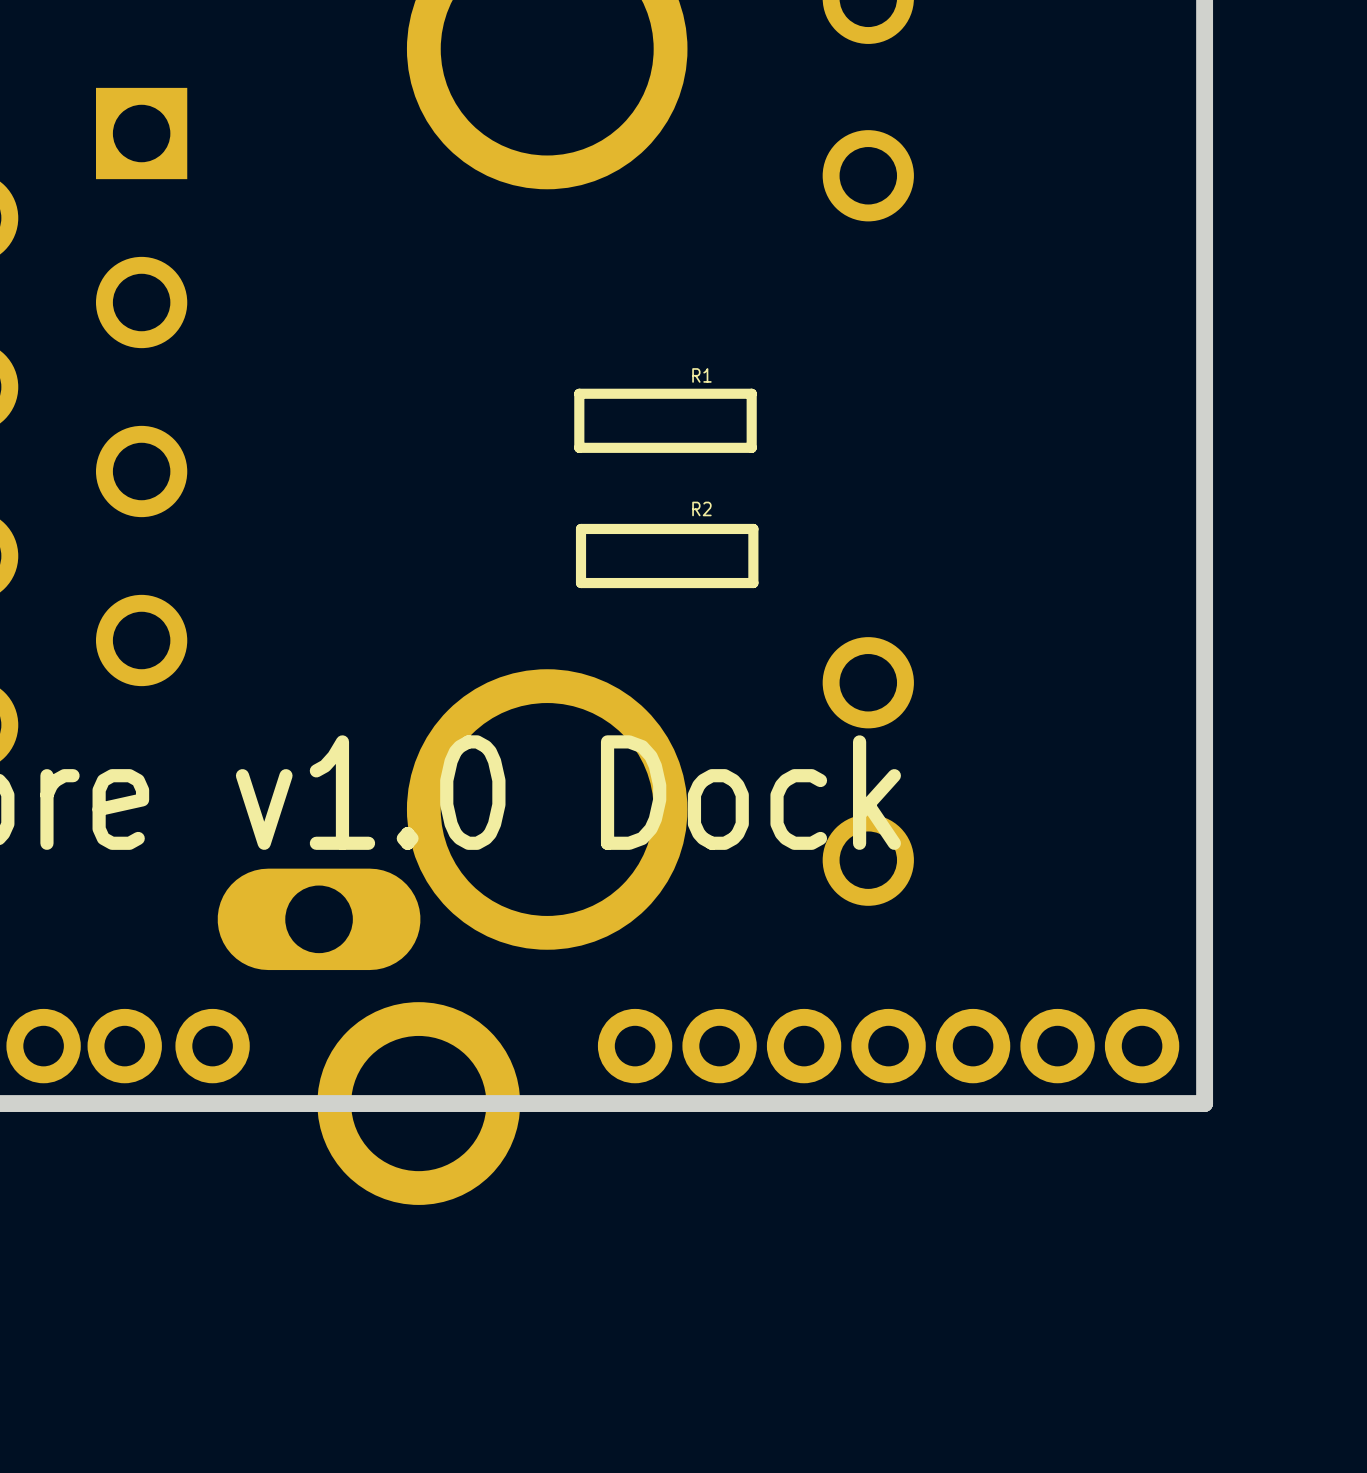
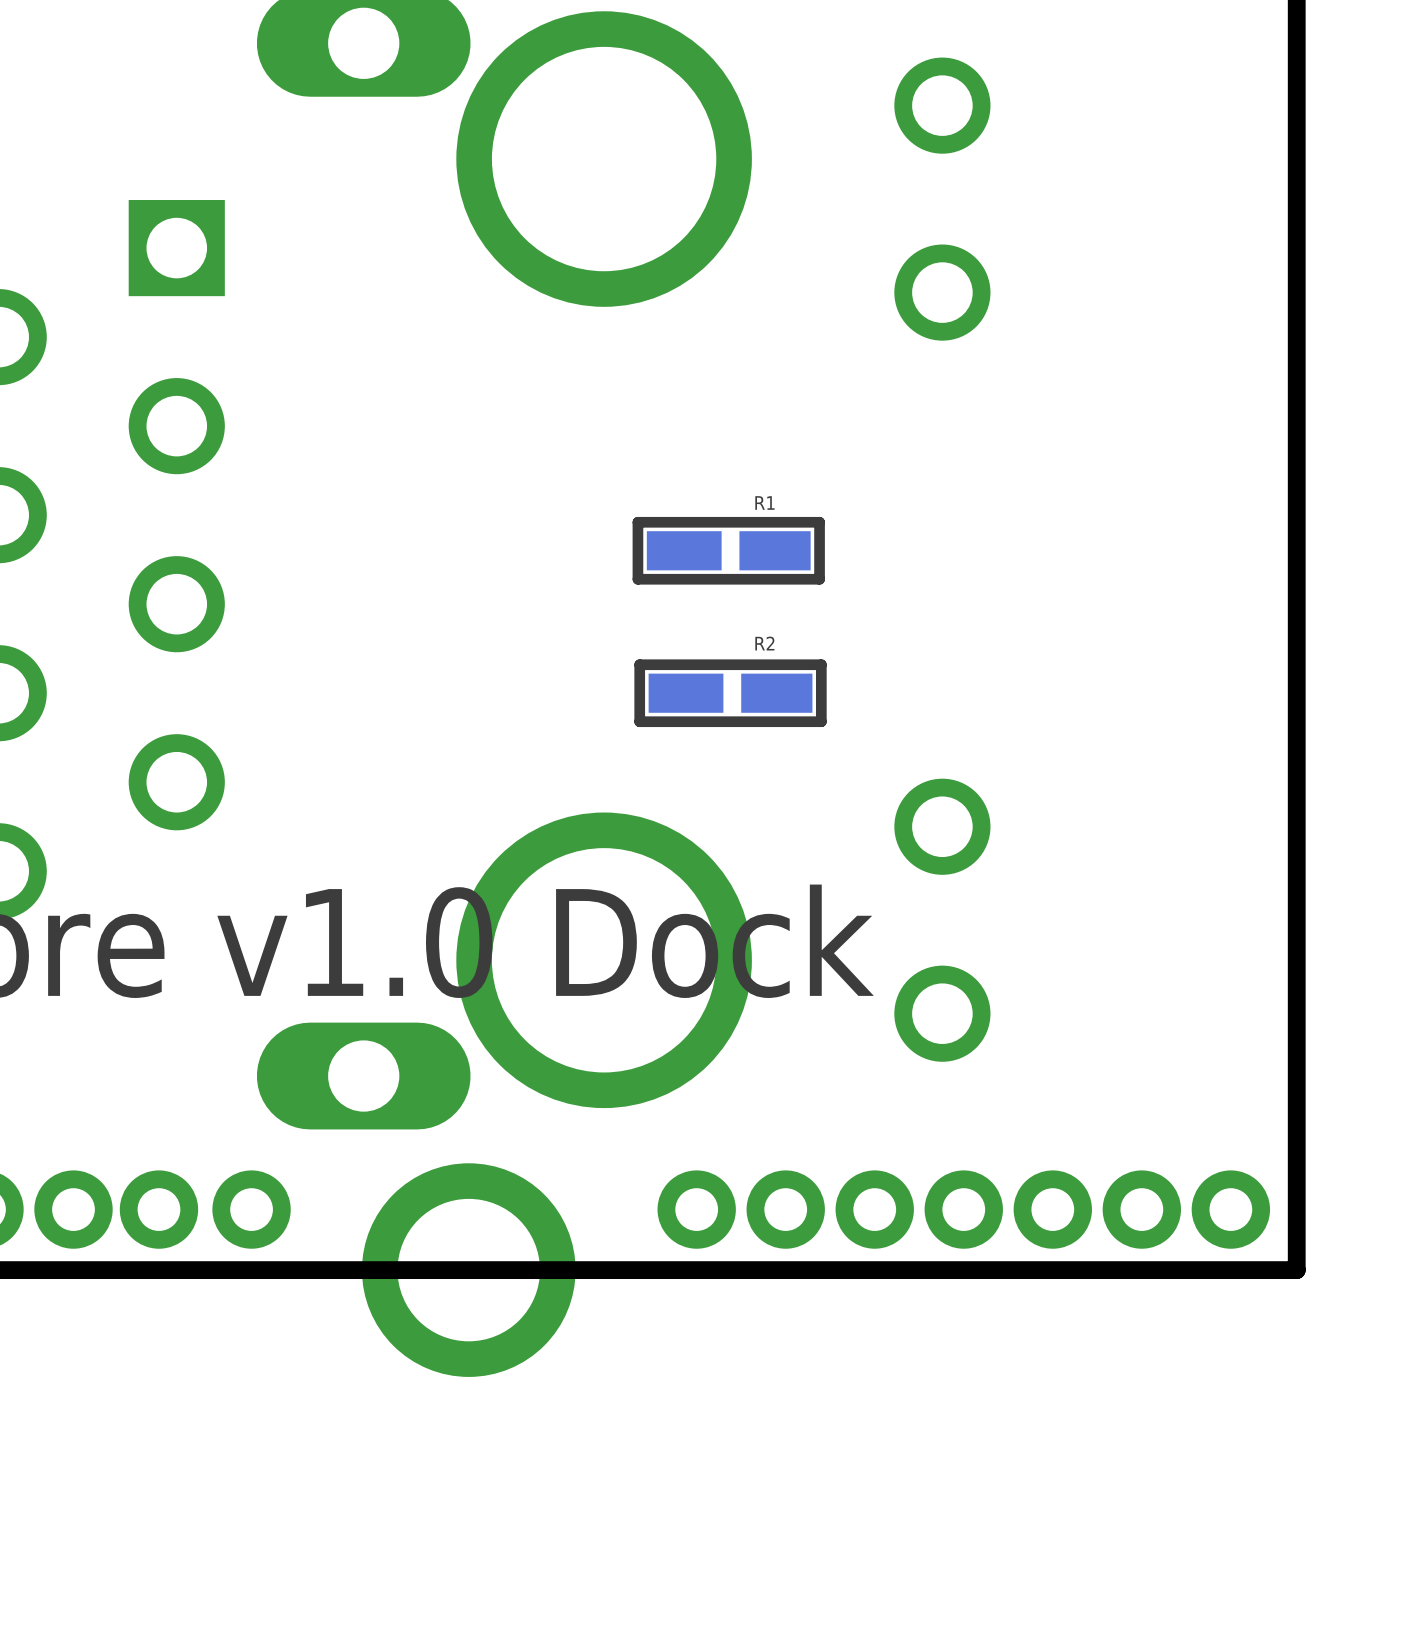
R1 footprint: [574, 388, 757, 453] -> [632, 516, 825, 585]
R2 footprint: [575, 523, 759, 589] -> [634, 659, 827, 728]

